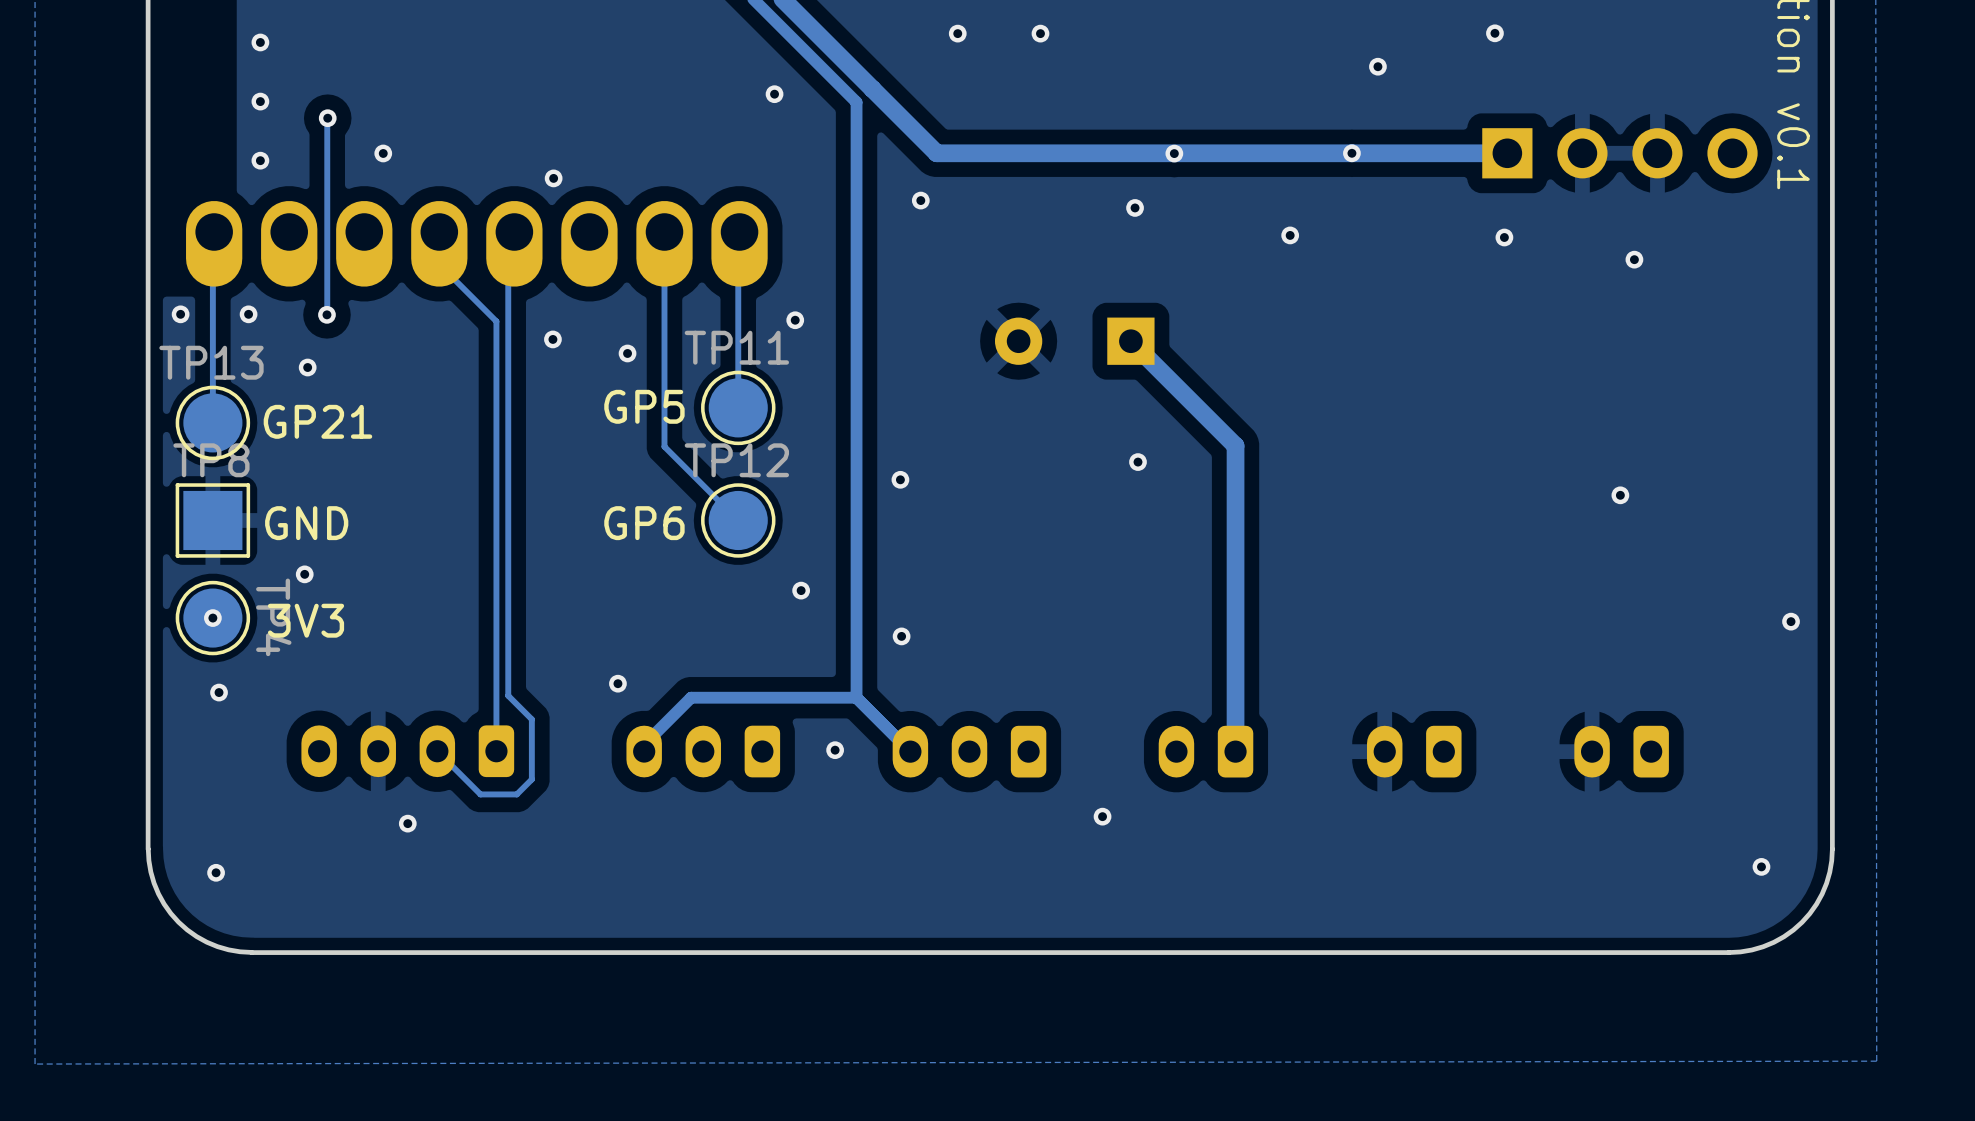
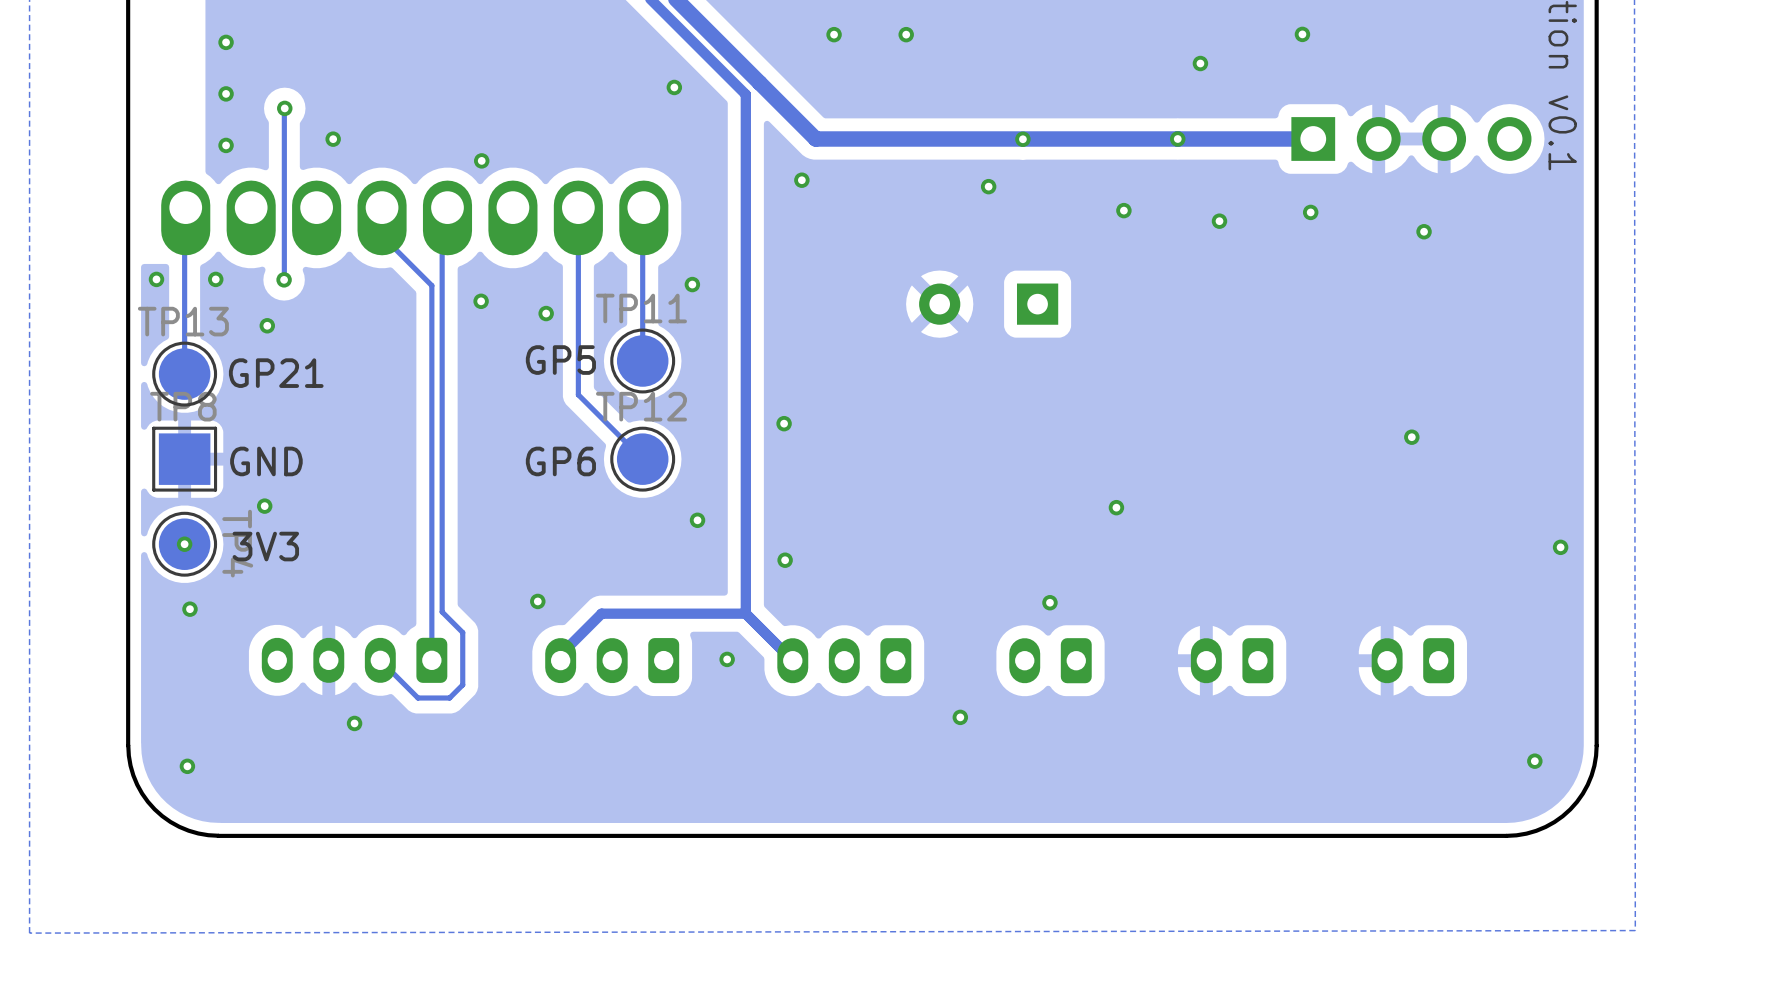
via: none -> (1219, 221)
part position: (1074, 341) -> (988, 304)
track: (1130, 341) (1235, 445) (1235, 751) -> none
via: (1138, 462) -> none
via: none -> (1116, 507)
via: none -> (1049, 602)

